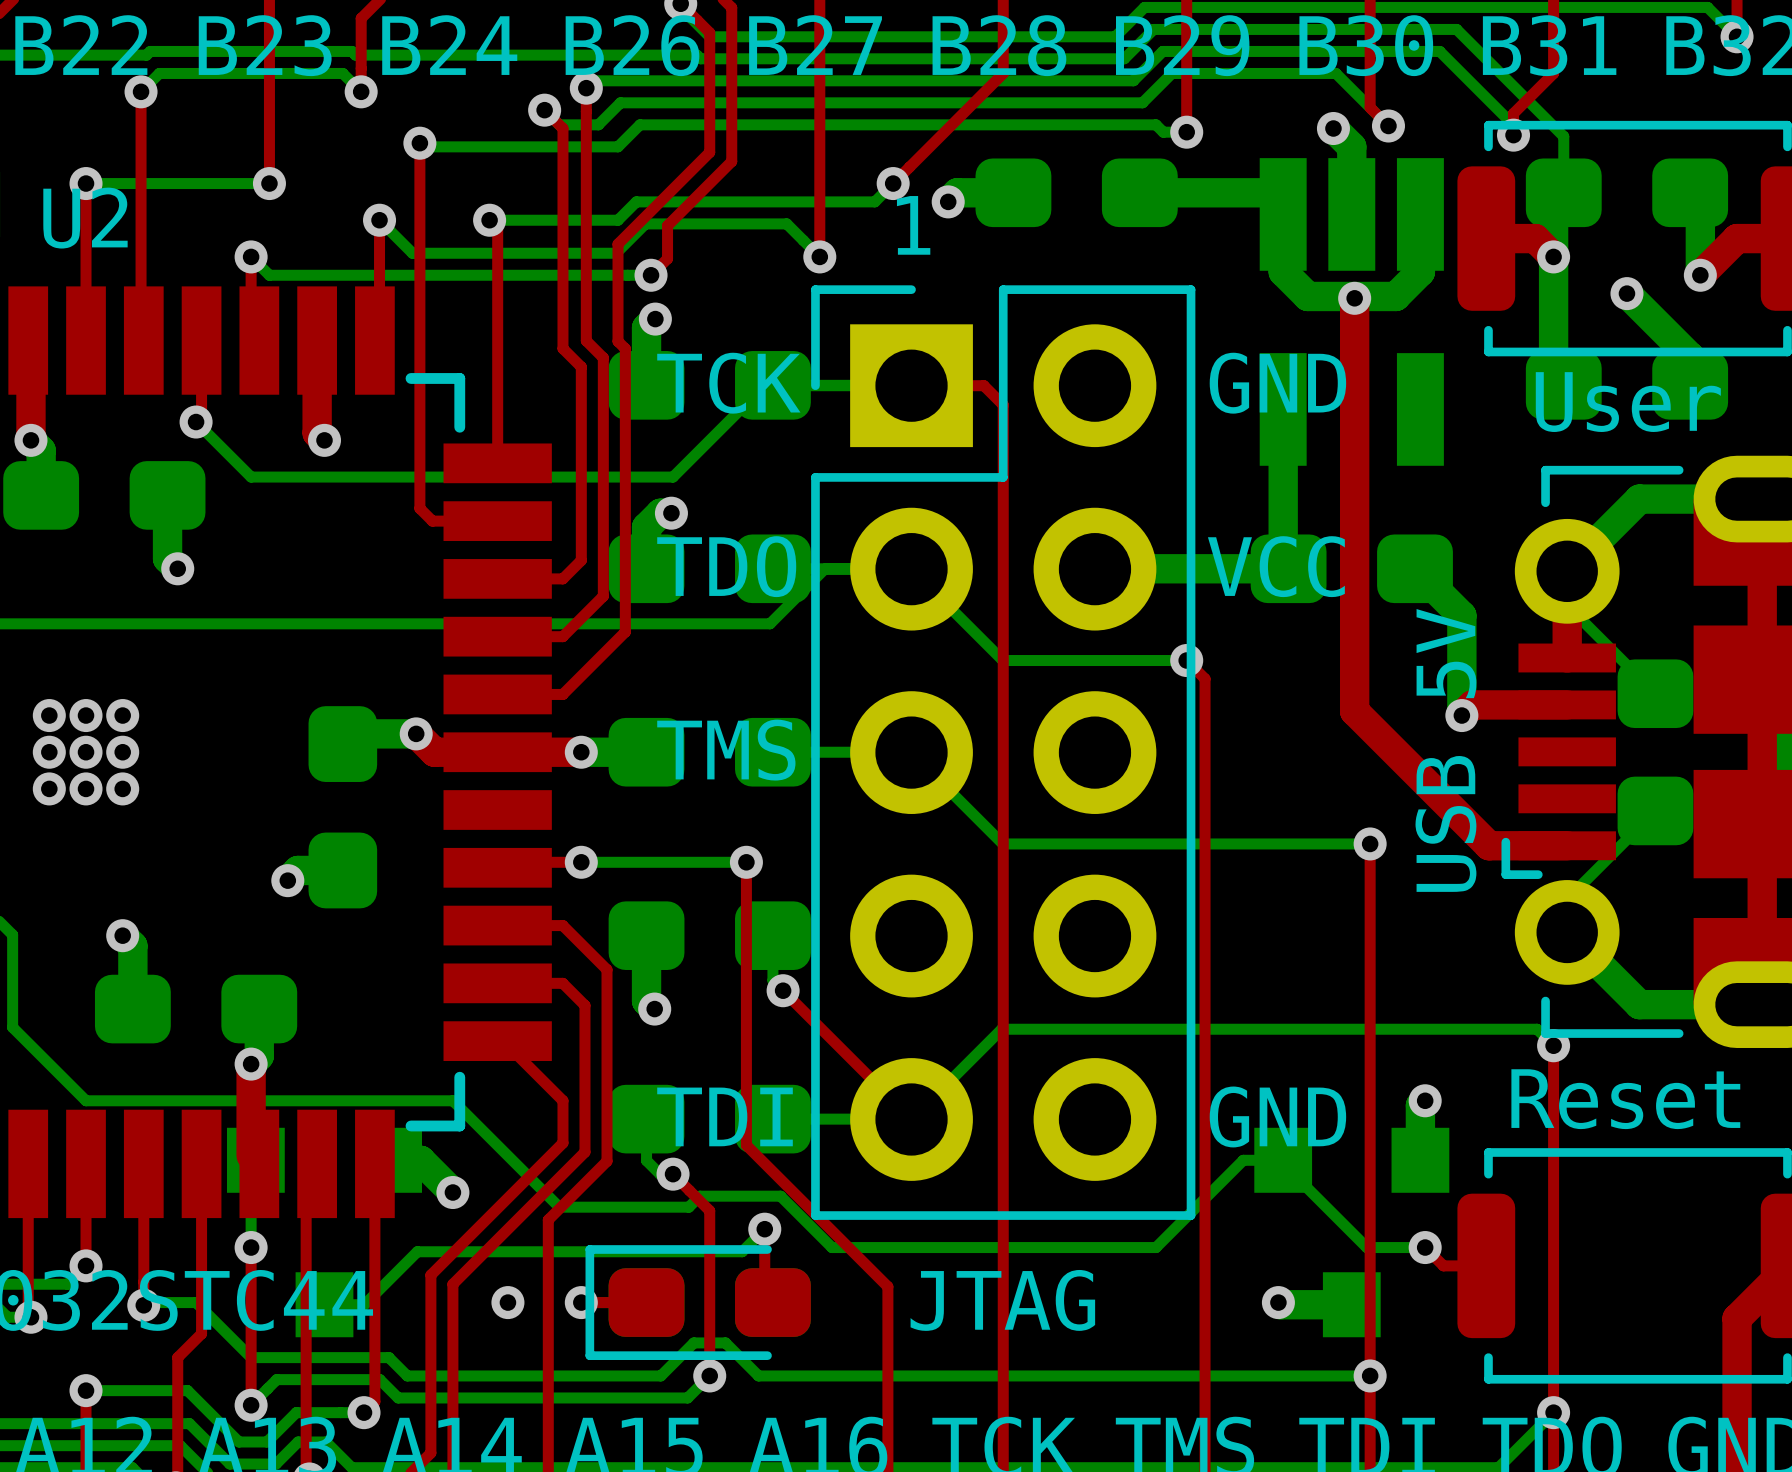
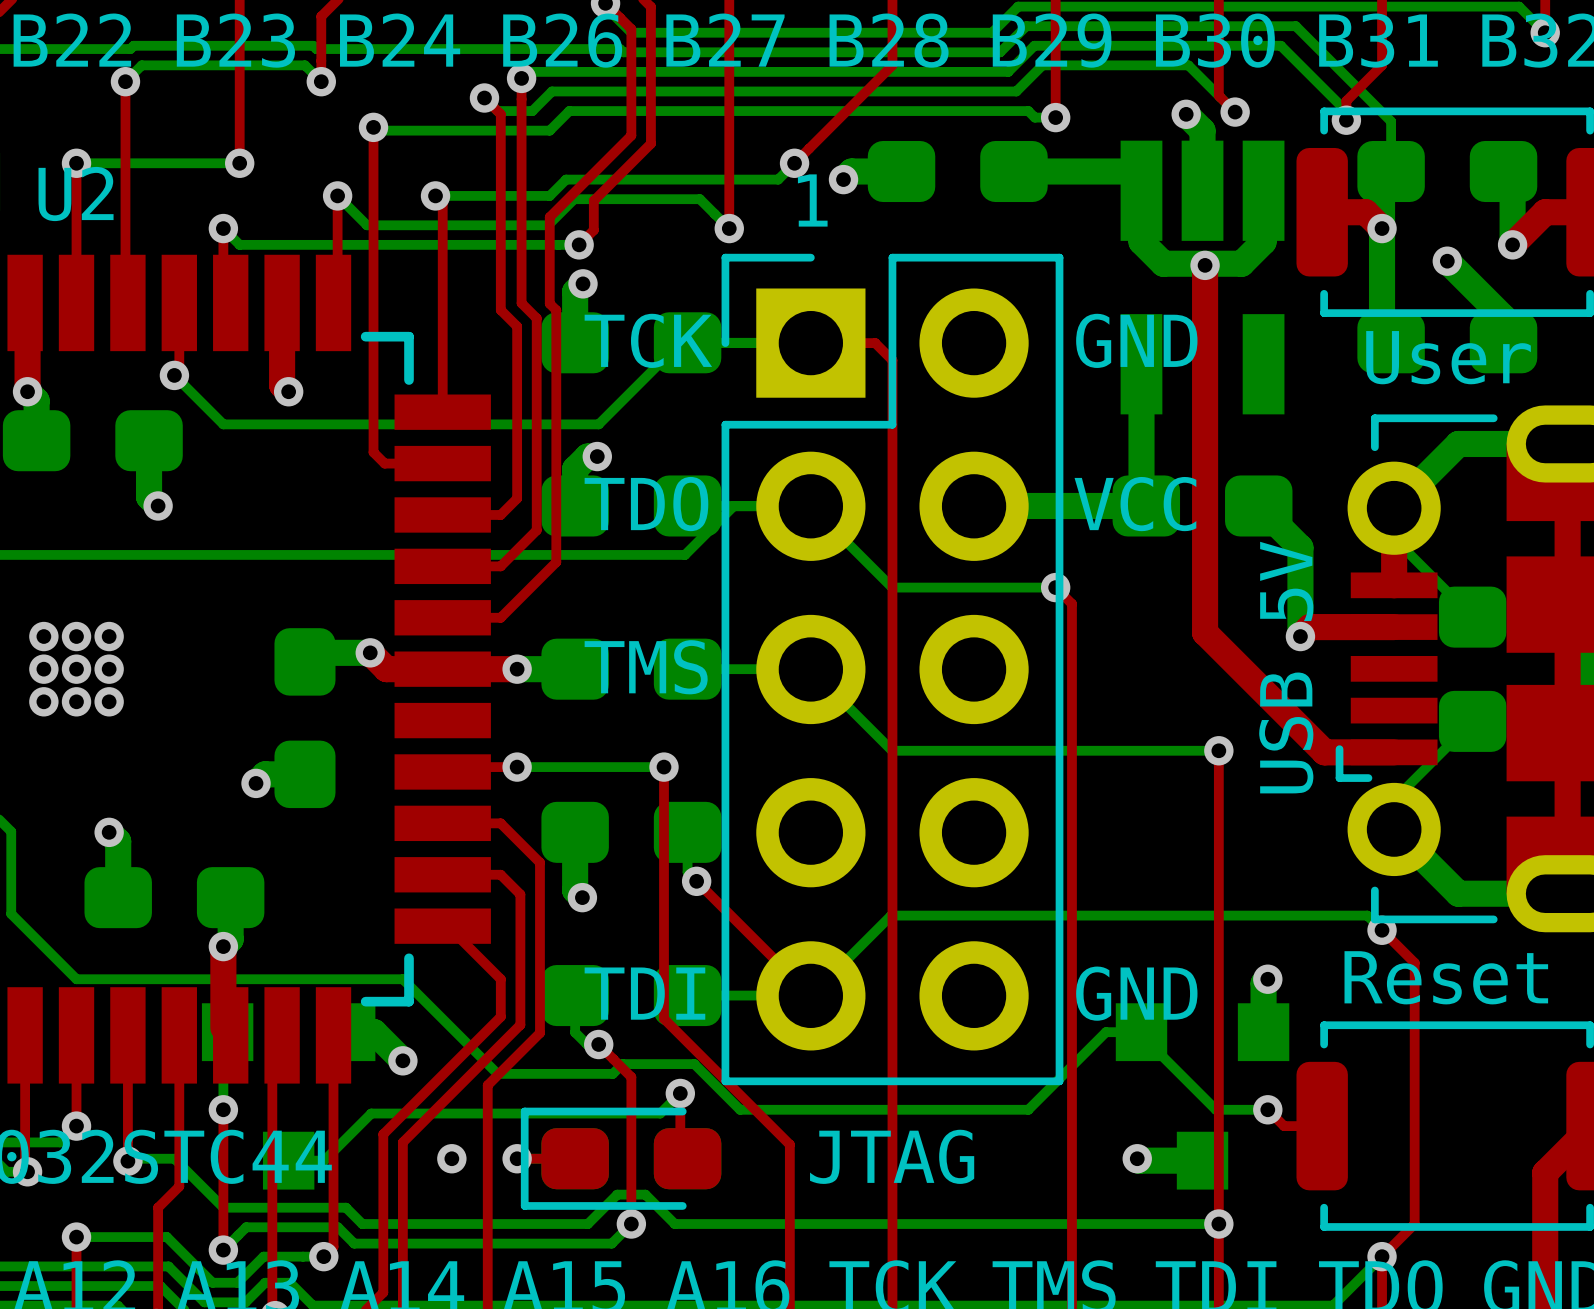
top track: (1553, 1045) (1553, 1412) -> (1382, 930) (1414, 962) (1414, 1224) (1382, 1256)

